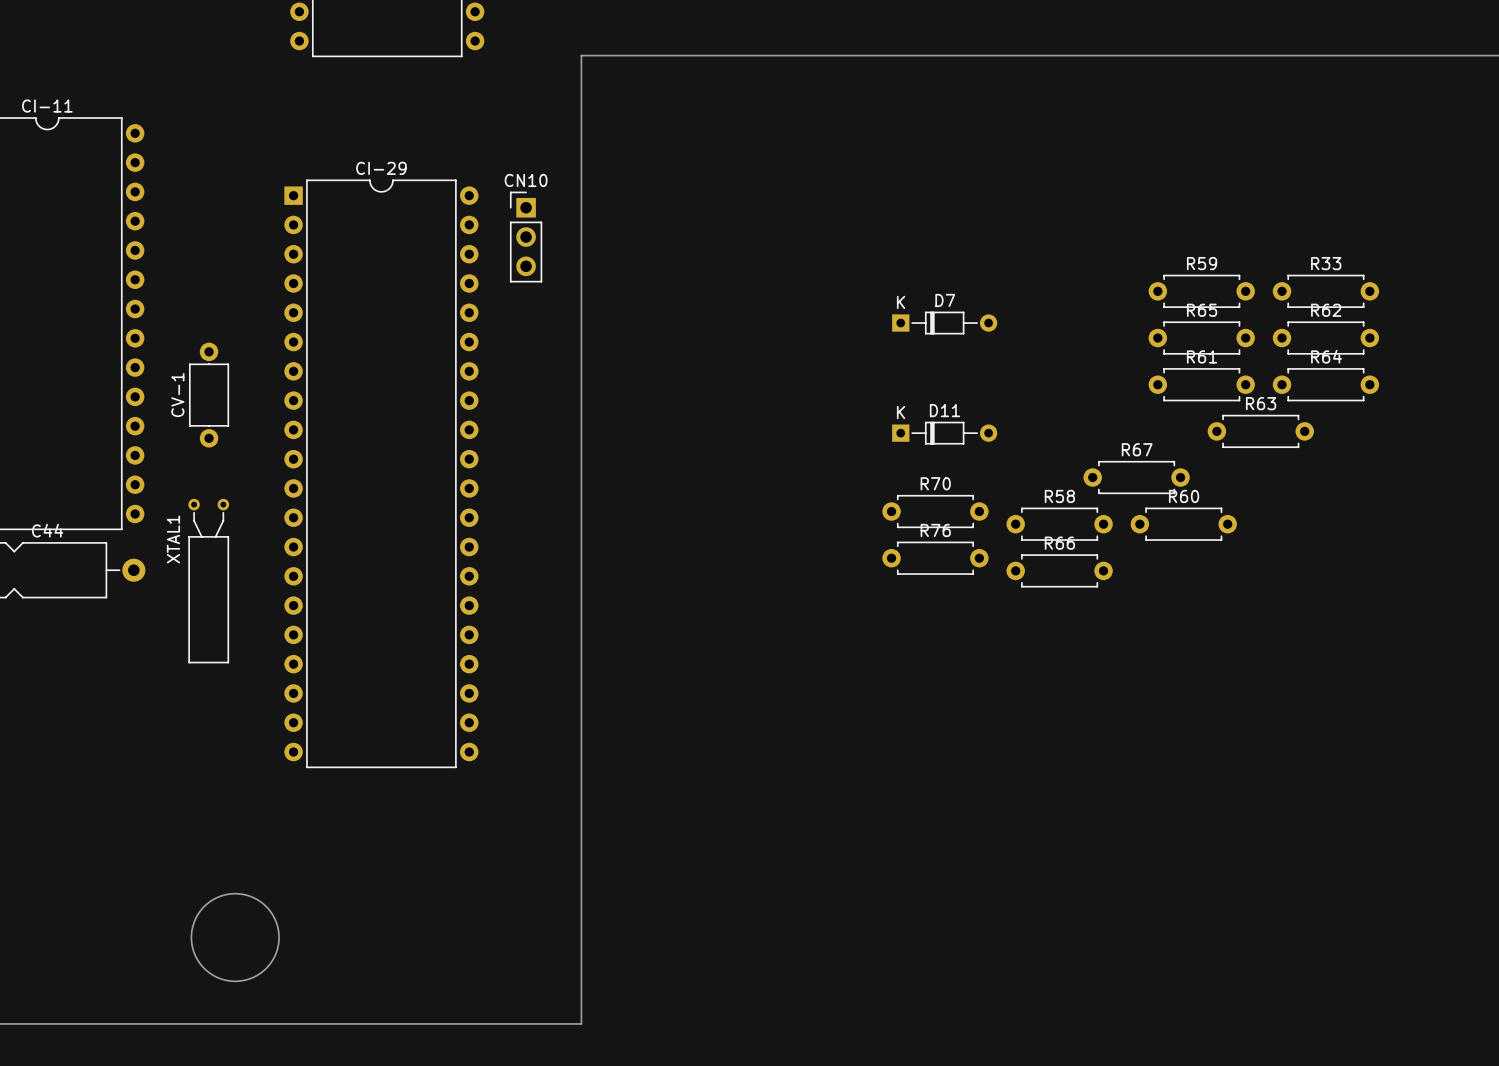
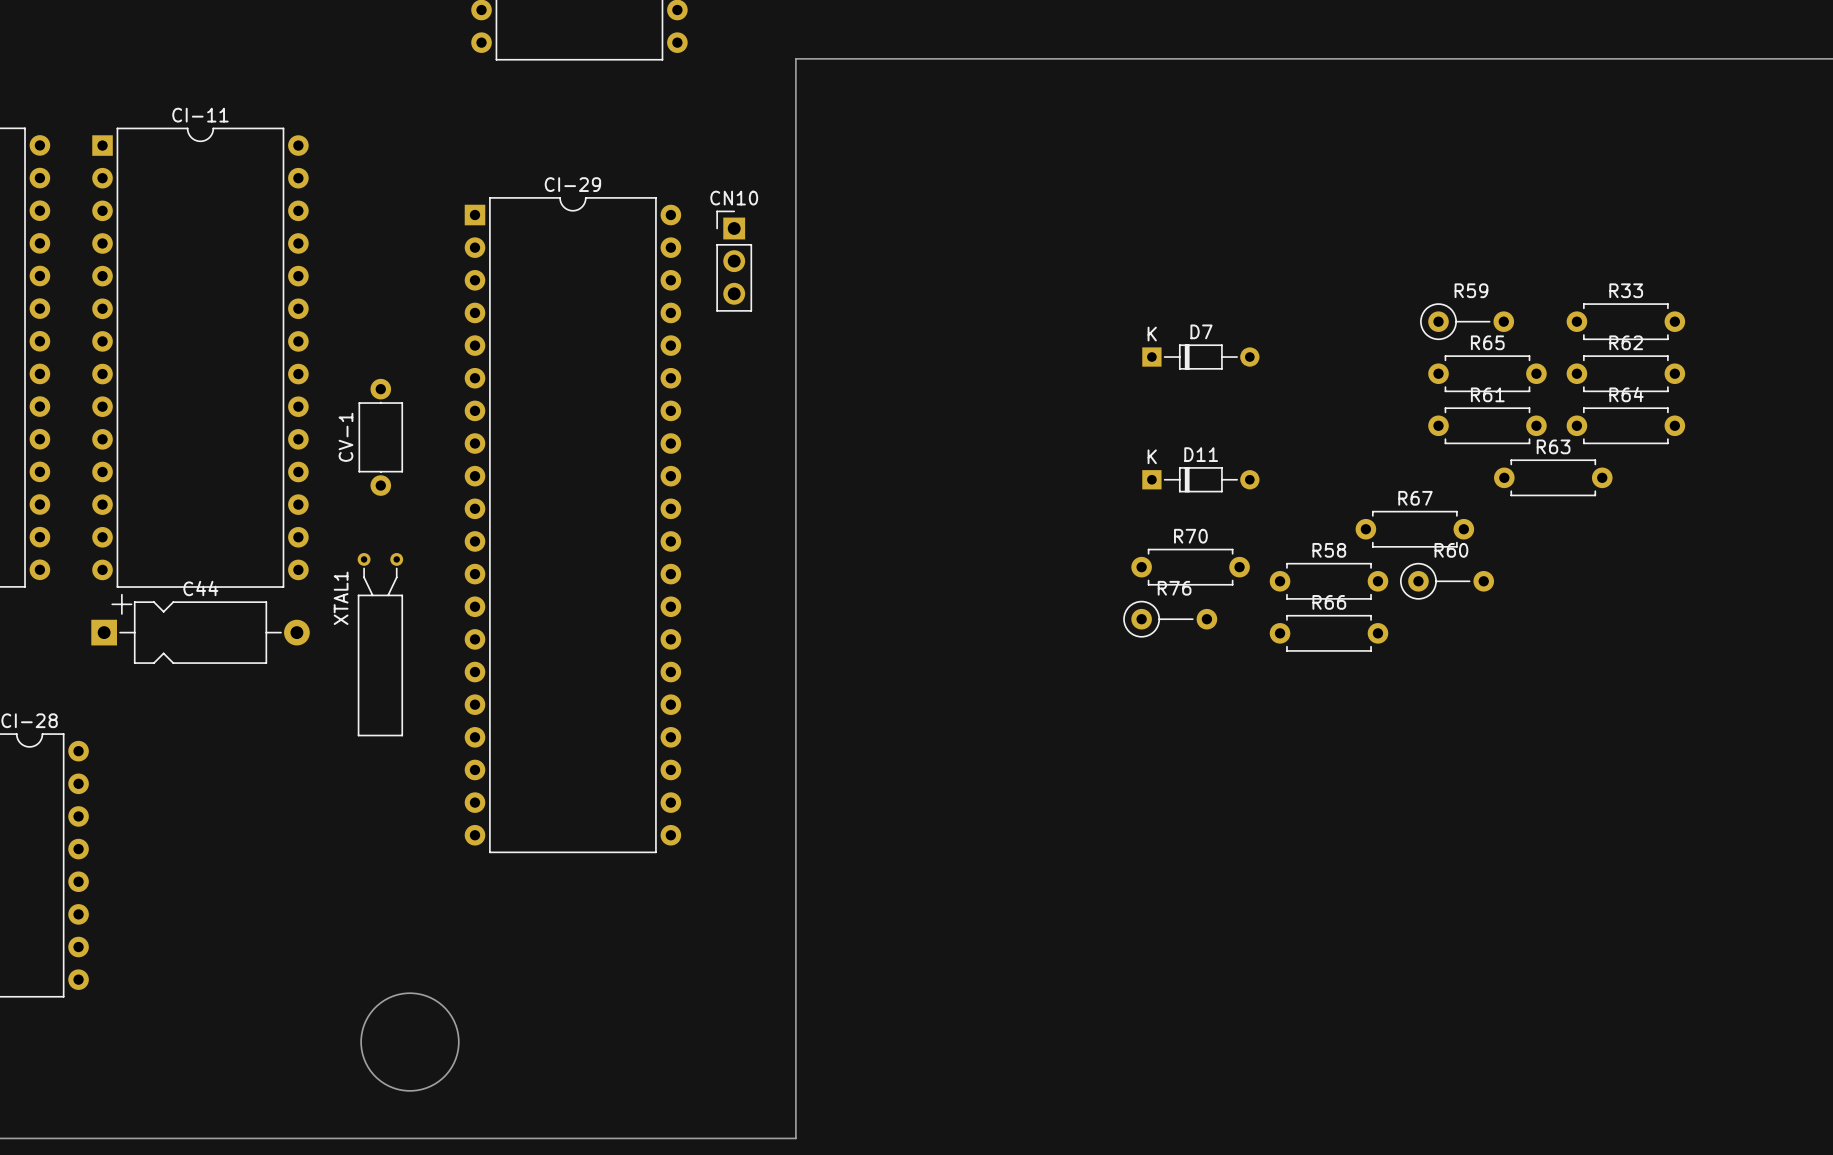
R59 footprint: [1148, 274, 1255, 308] -> [1420, 303, 1515, 341]
R60 footprint: [1130, 507, 1237, 541] -> [1400, 562, 1495, 600]
R76 footprint: [882, 541, 989, 575] -> [1123, 600, 1218, 638]

